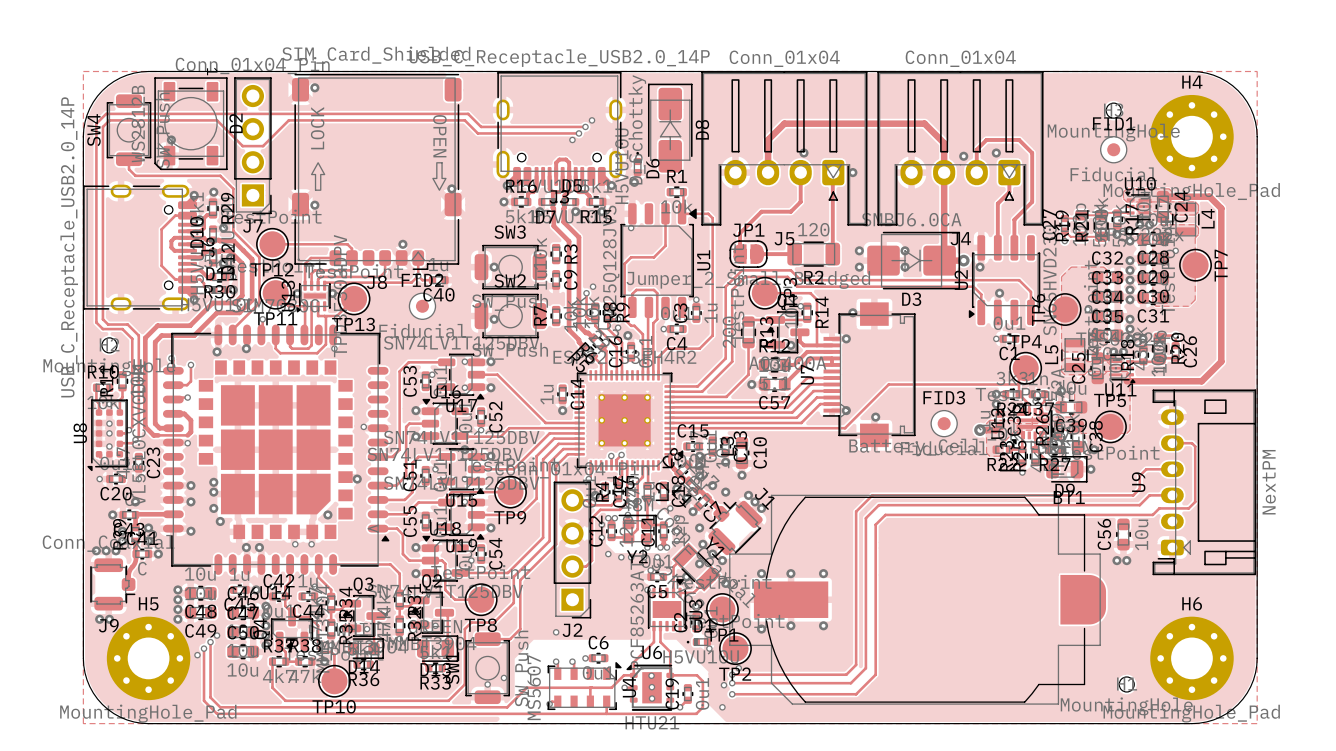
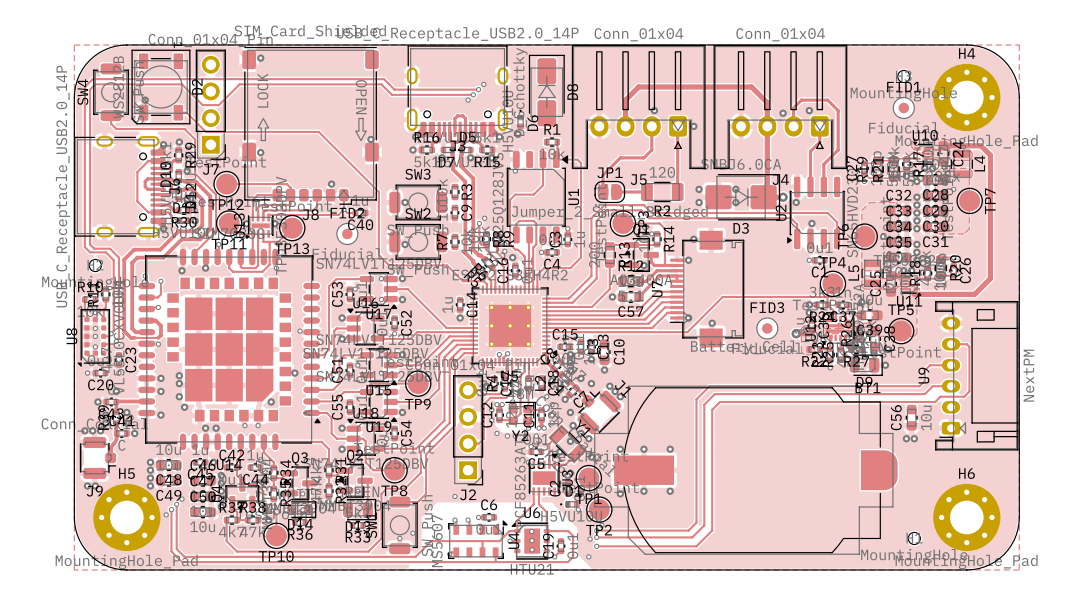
track: none -> (178, 112) (186, 112) (205, 131) (318, 131) (378, 191) (378, 254) (389, 265) (447, 265) (462, 281) (483, 281) (486, 284) (486, 289)

